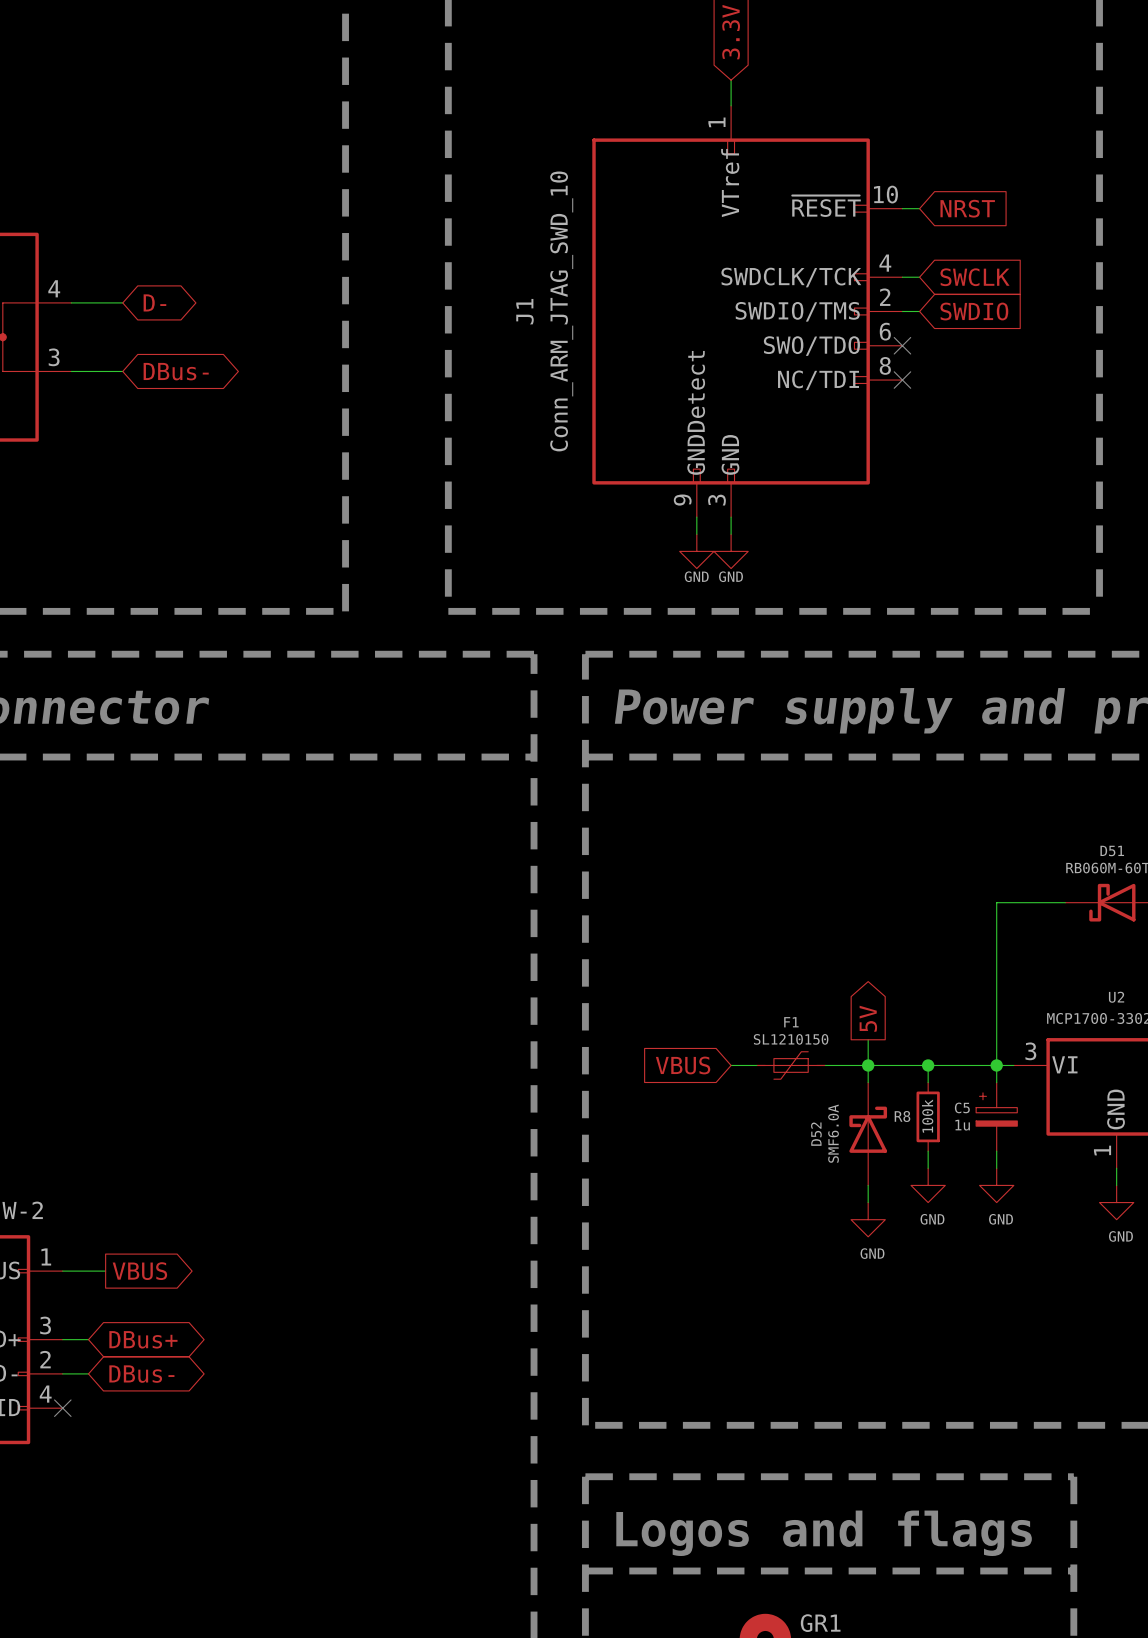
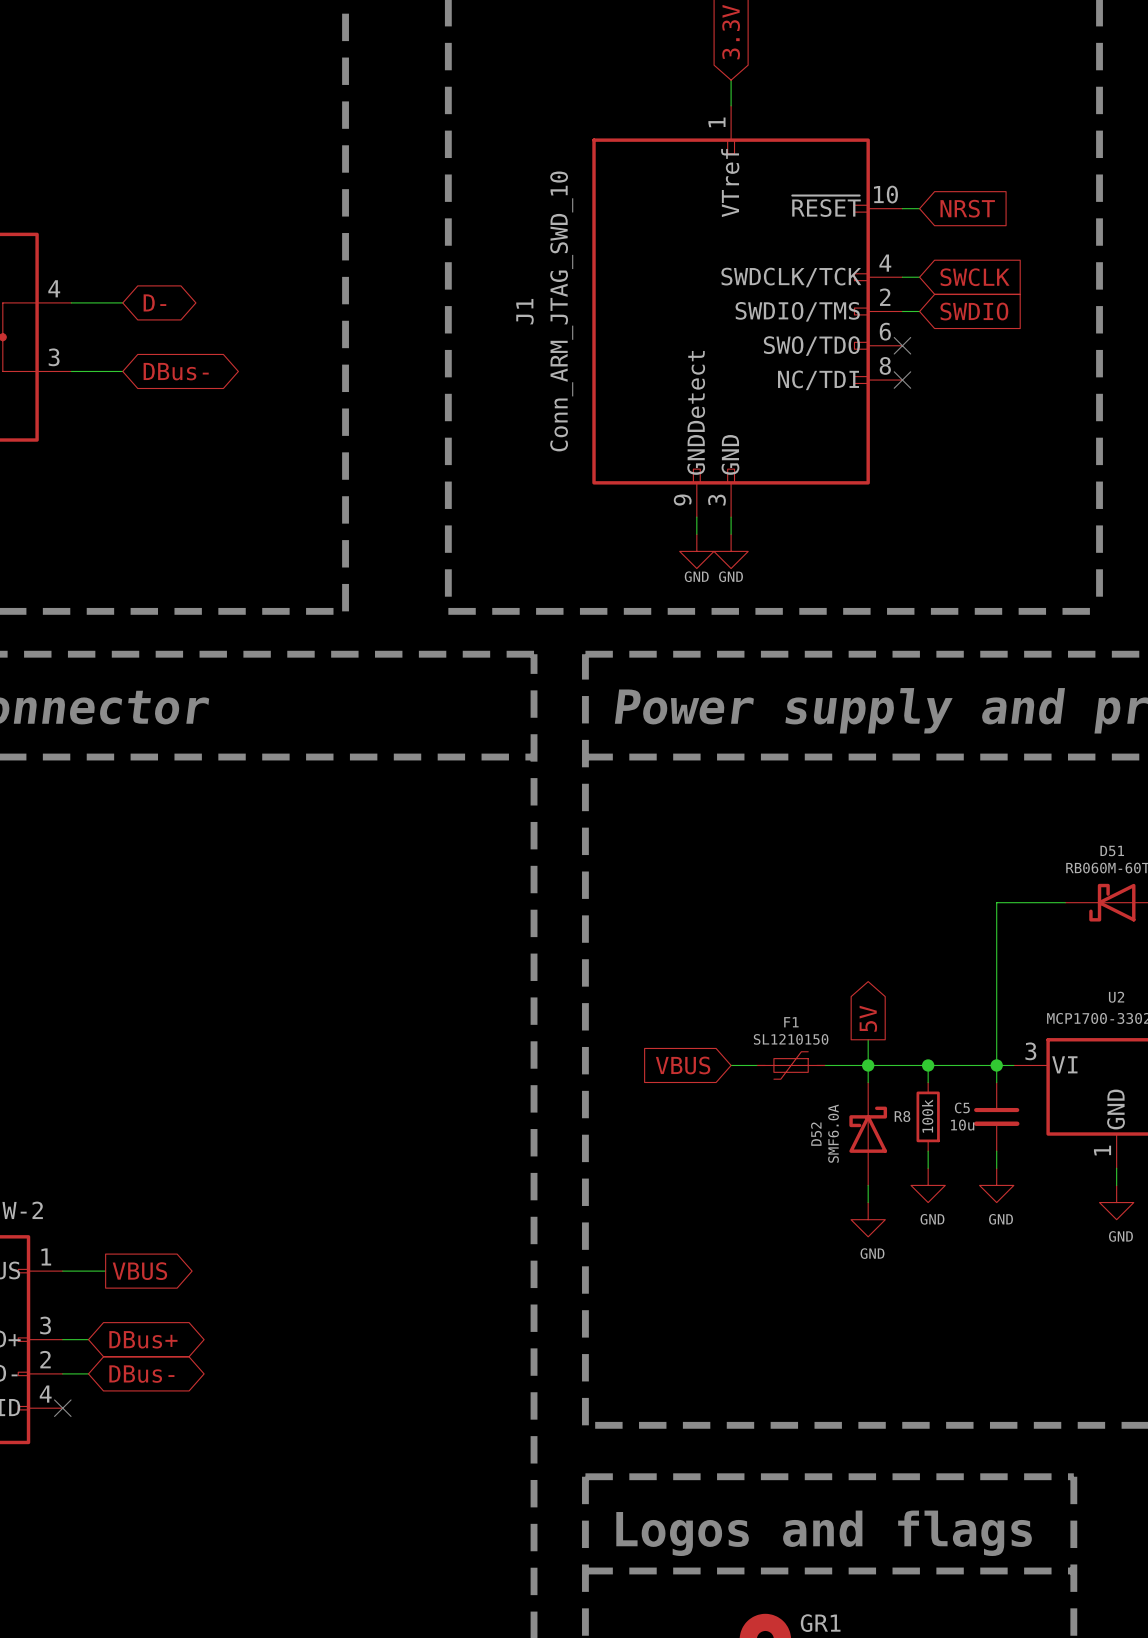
C5 symbol: [976, 1082, 1018, 1152] -> [973, 1082, 1020, 1152]
C5 value: 1u (962, 1125) -> 10u (962, 1125)

